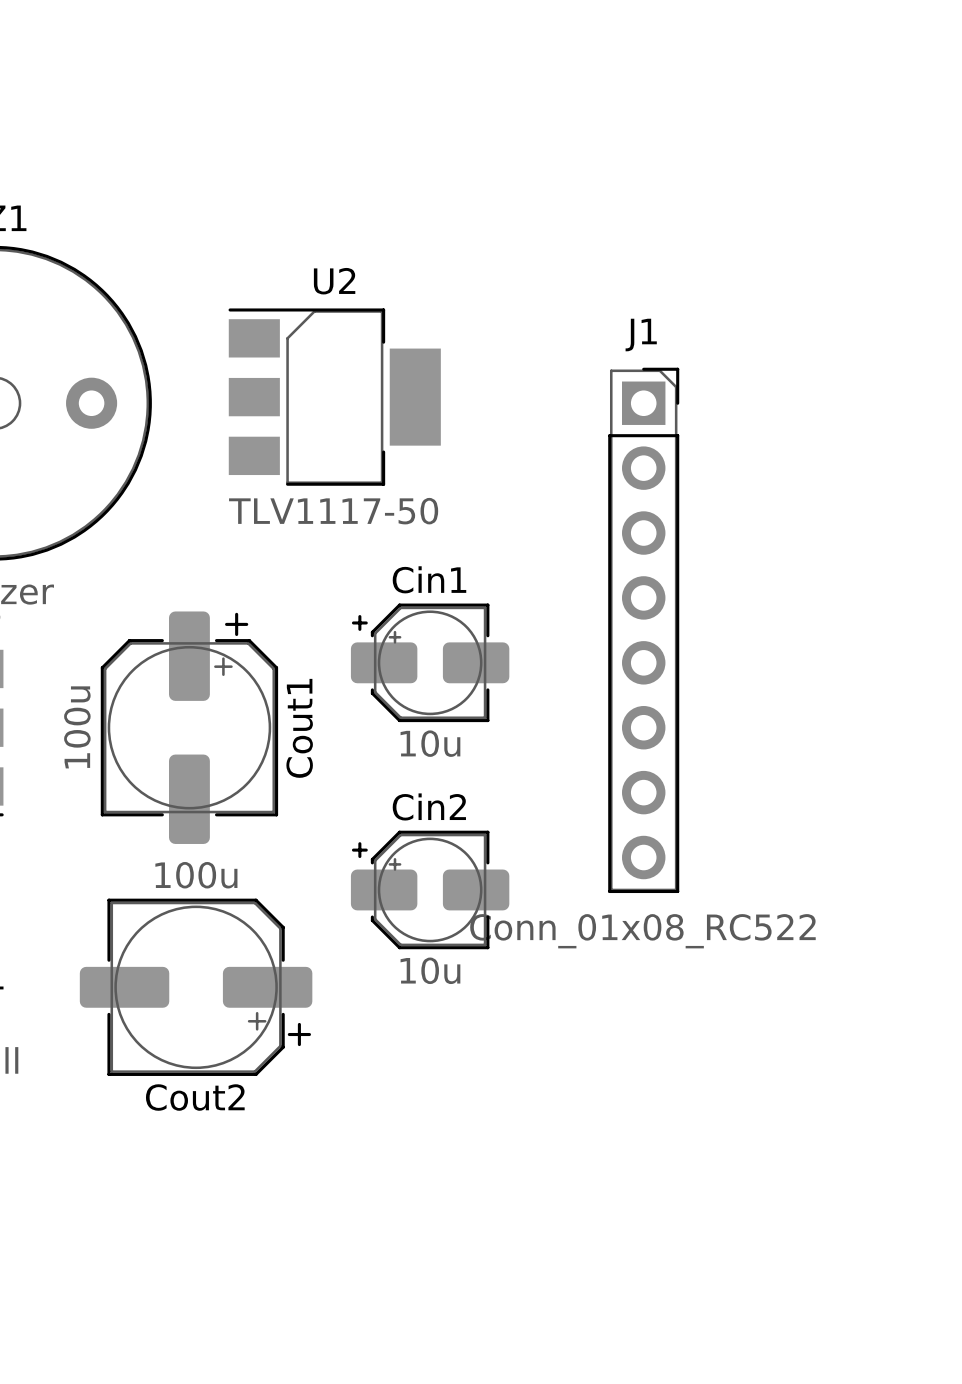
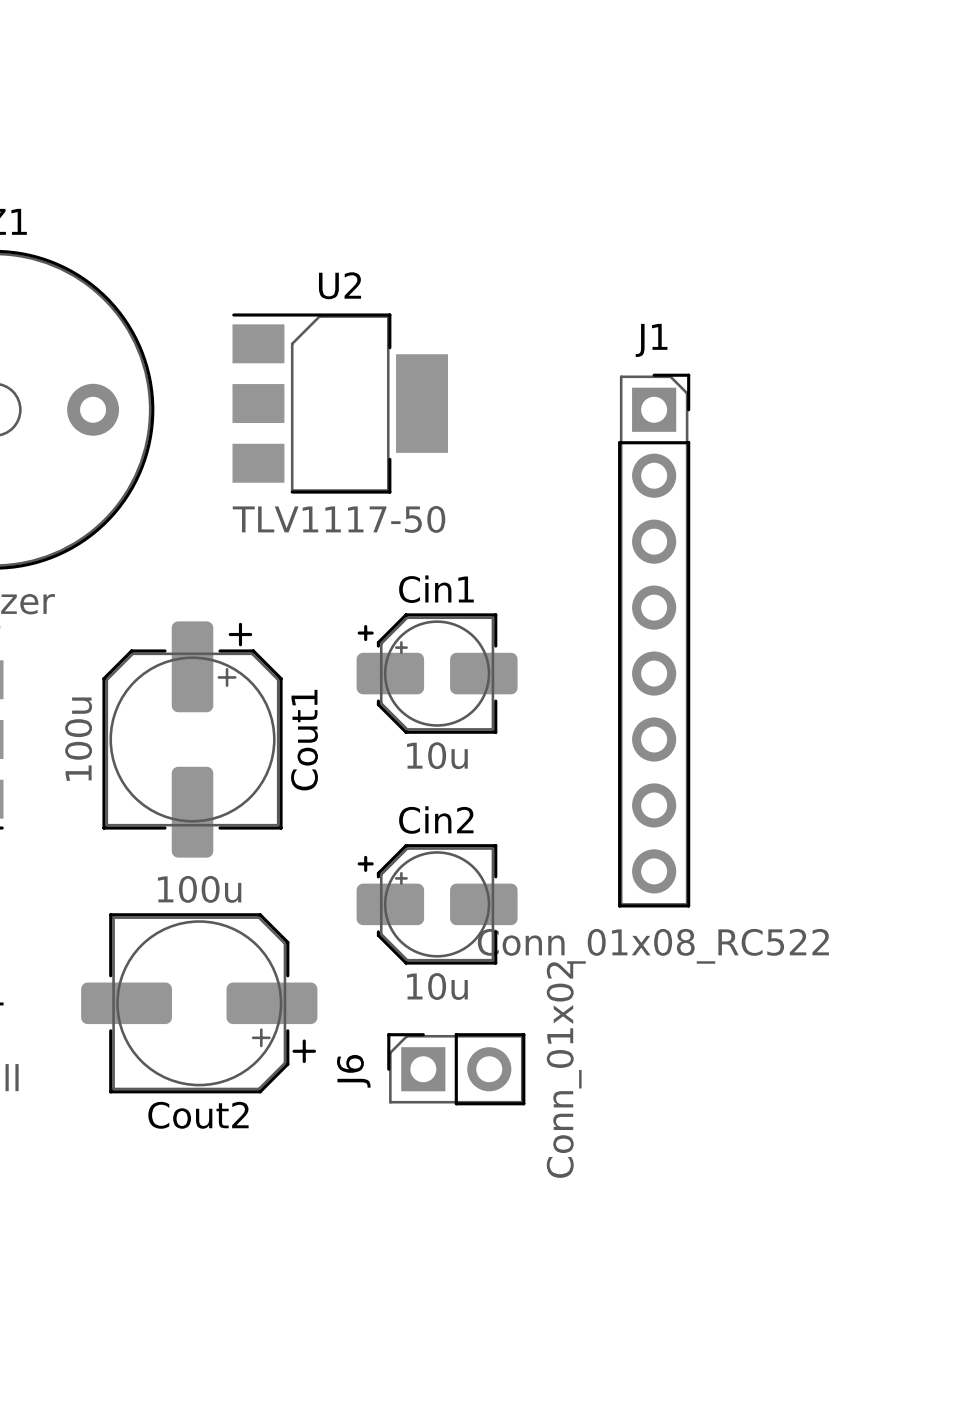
J6: none -> Conn_01x02 (456, 1069)

